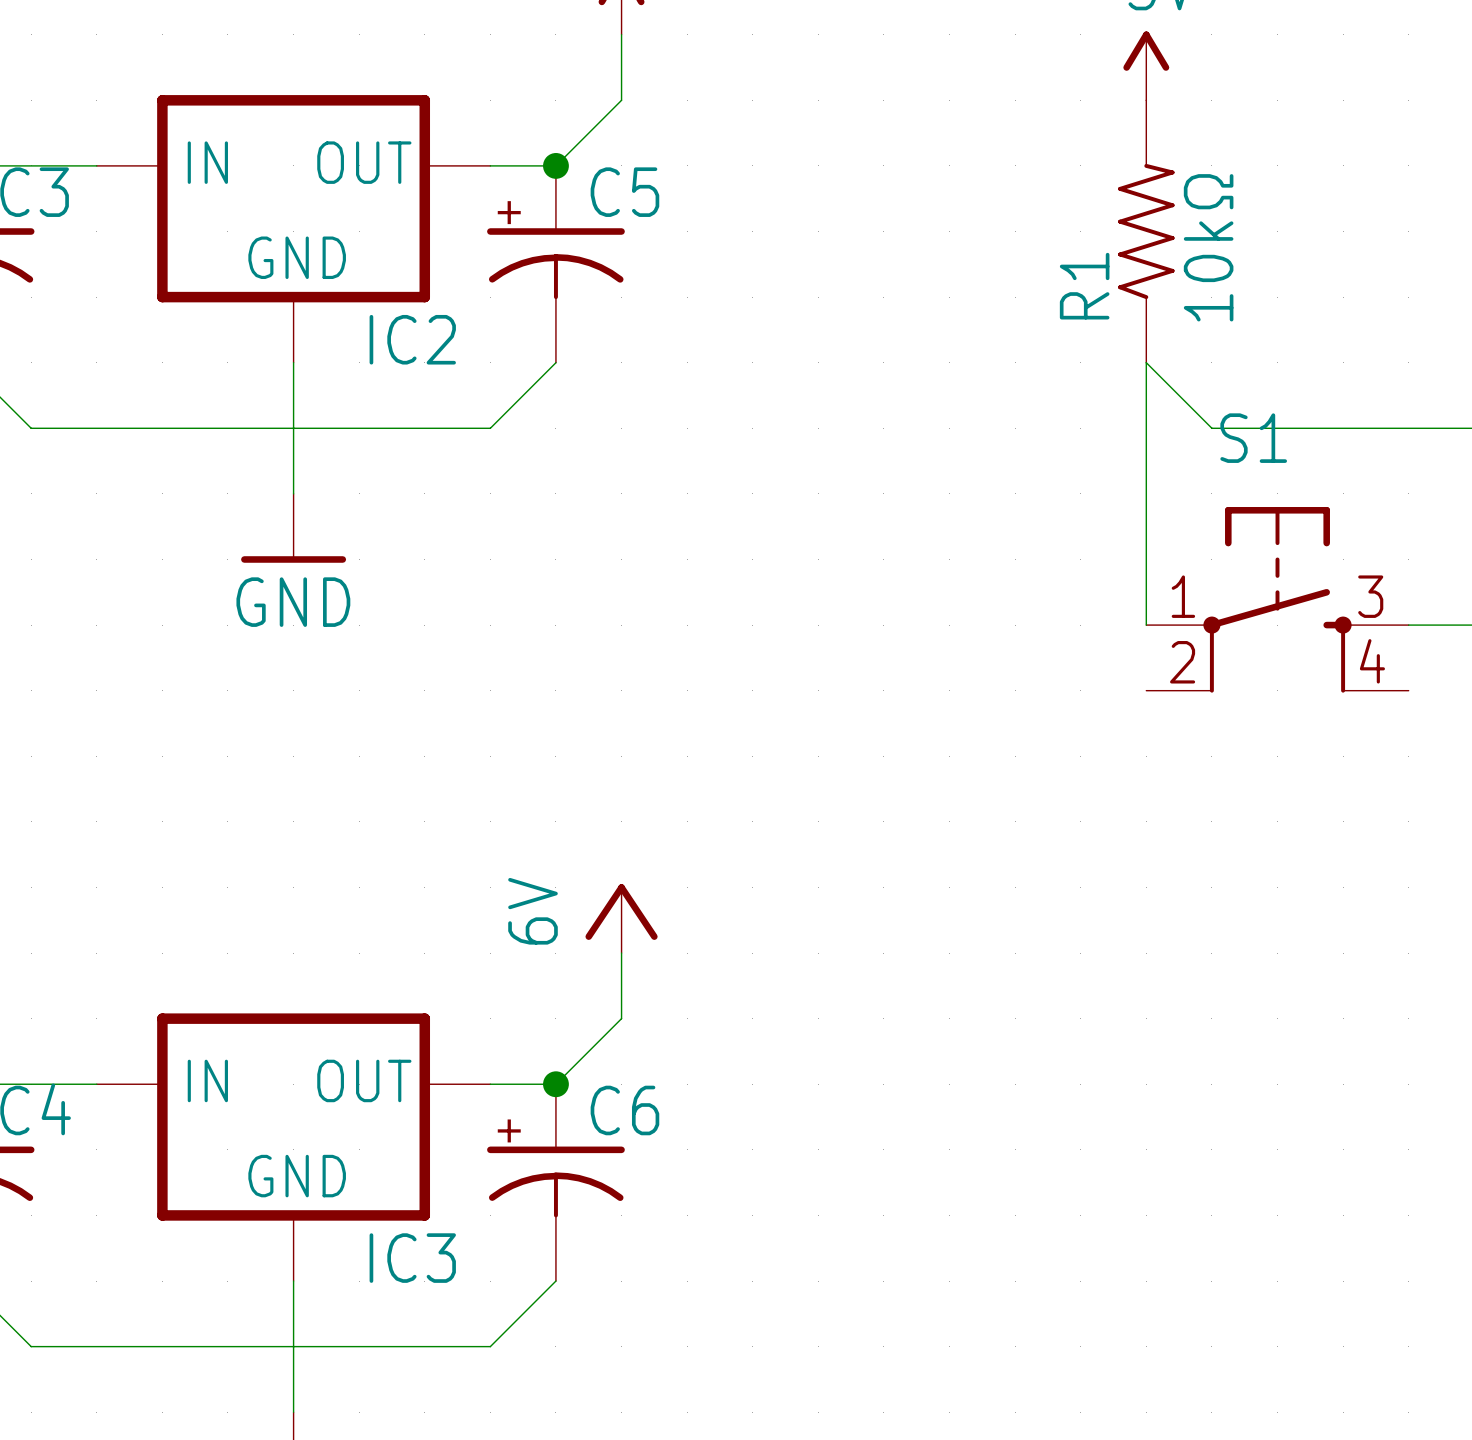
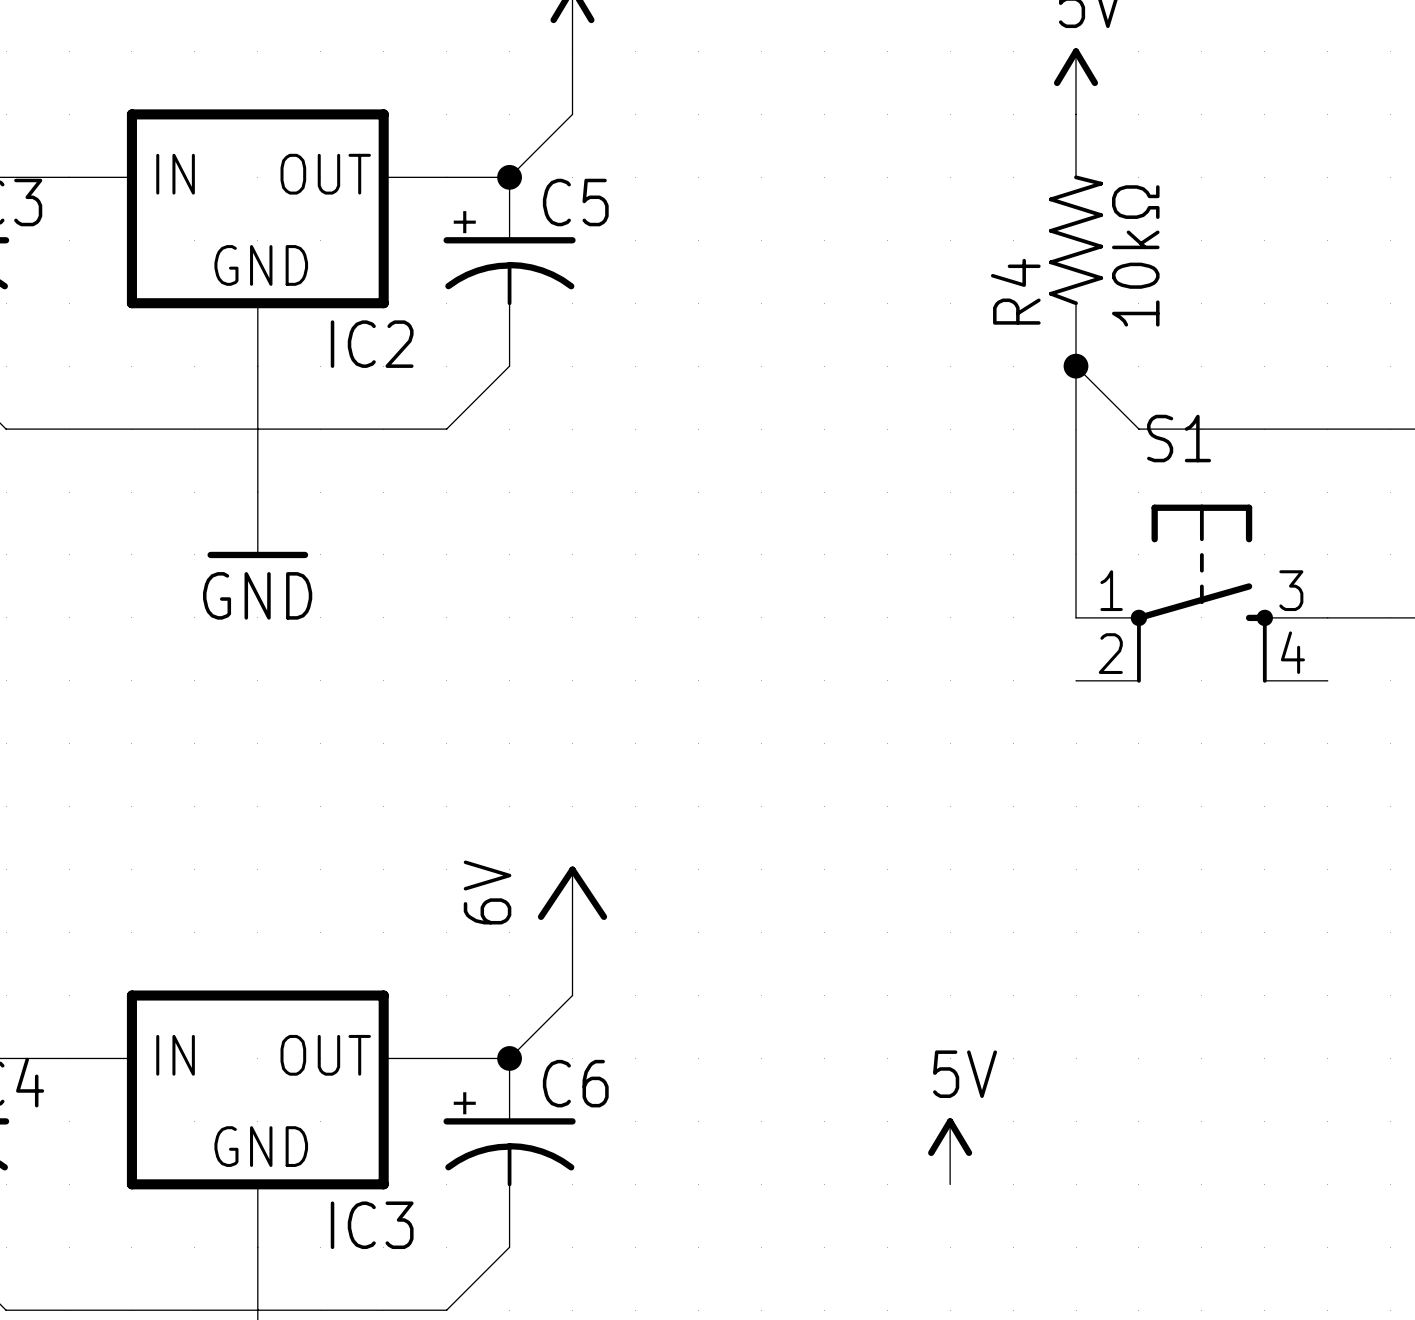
R1 name: R1 (1084, 286) -> R4 (1015, 291)
junction: none -> (1076, 366)
power symbol: none -> 5V (950, 1151)

